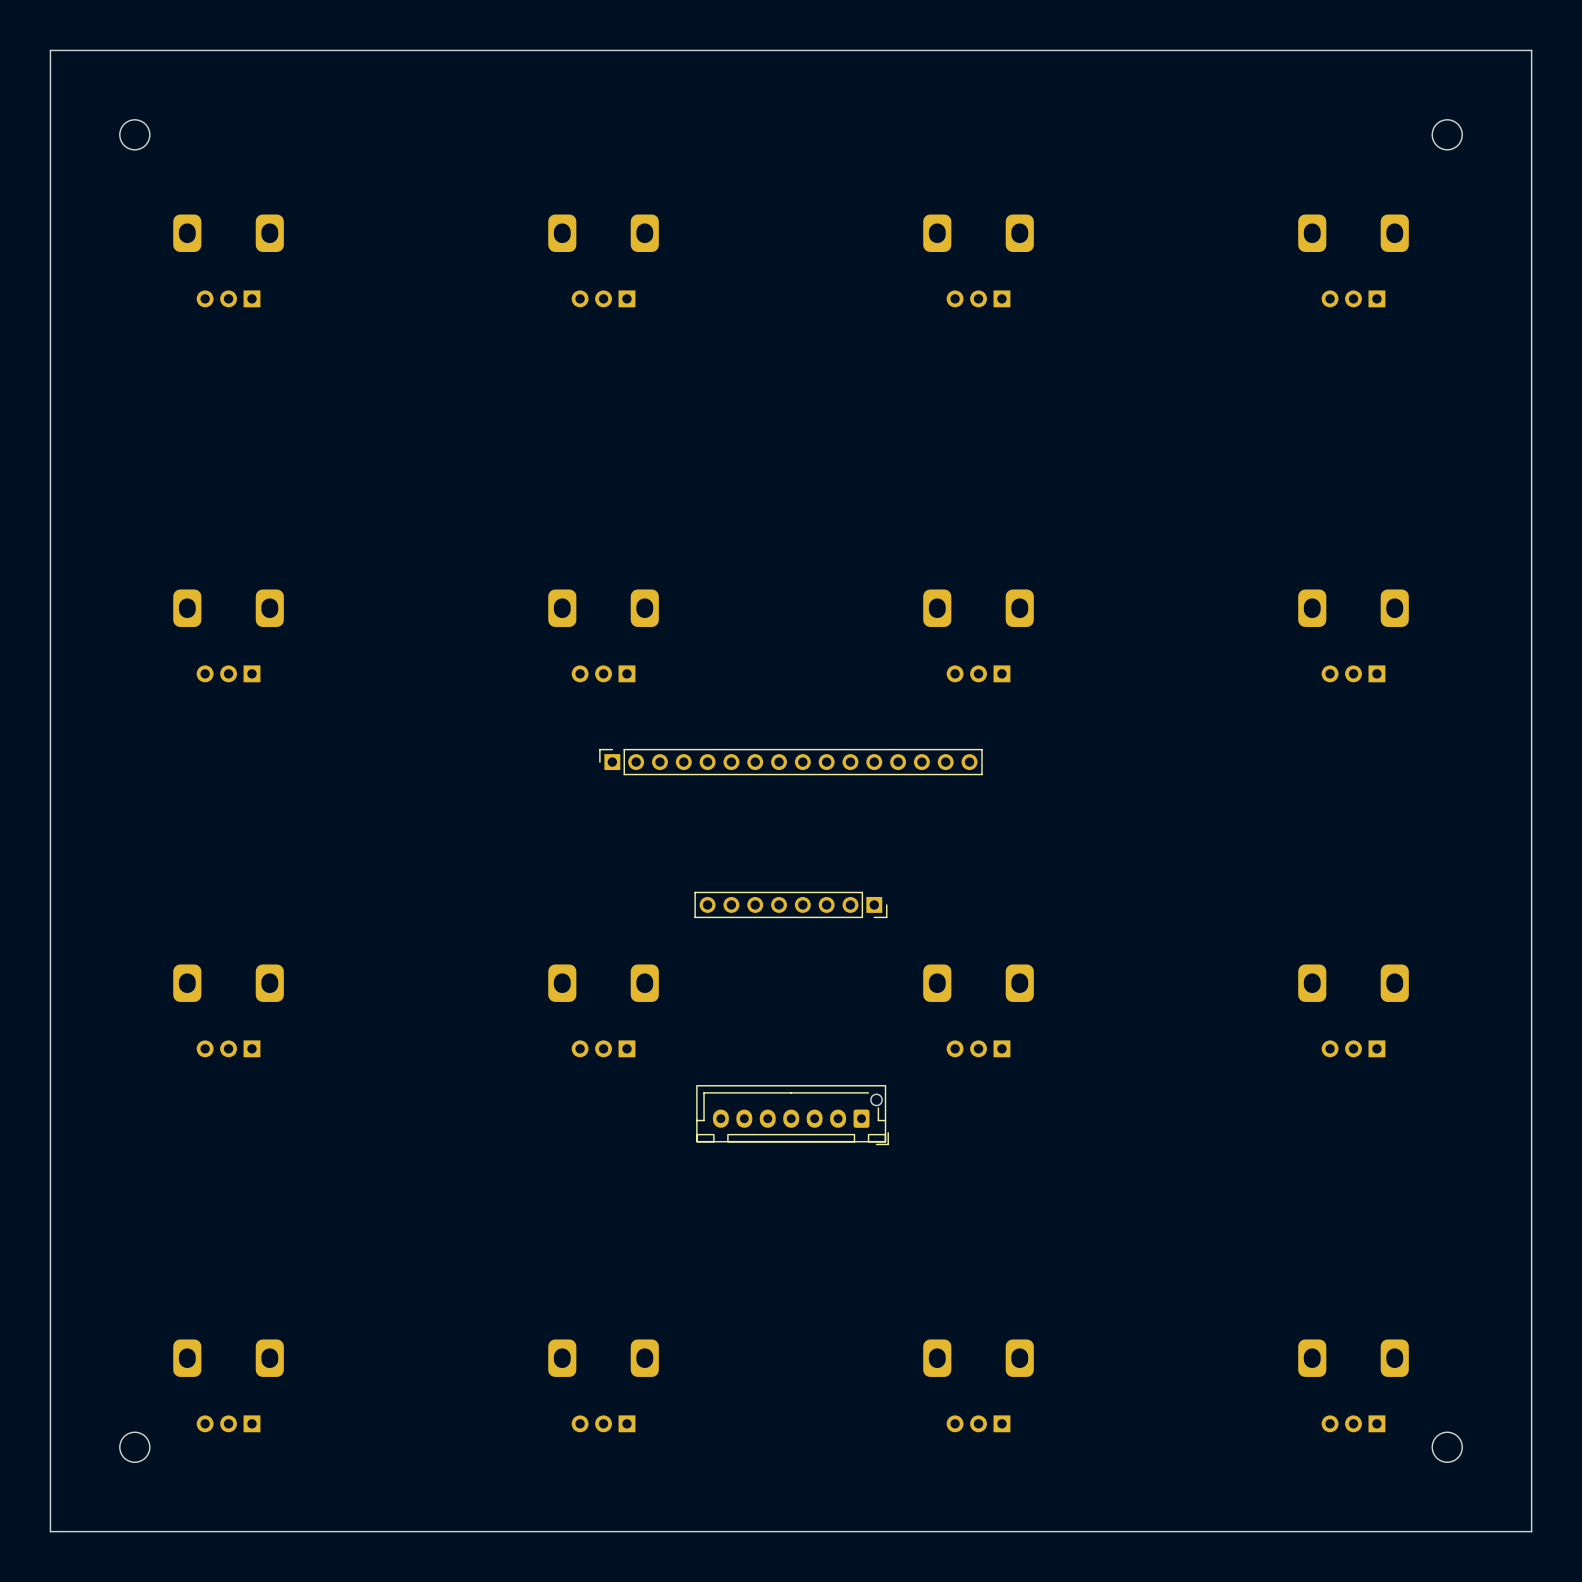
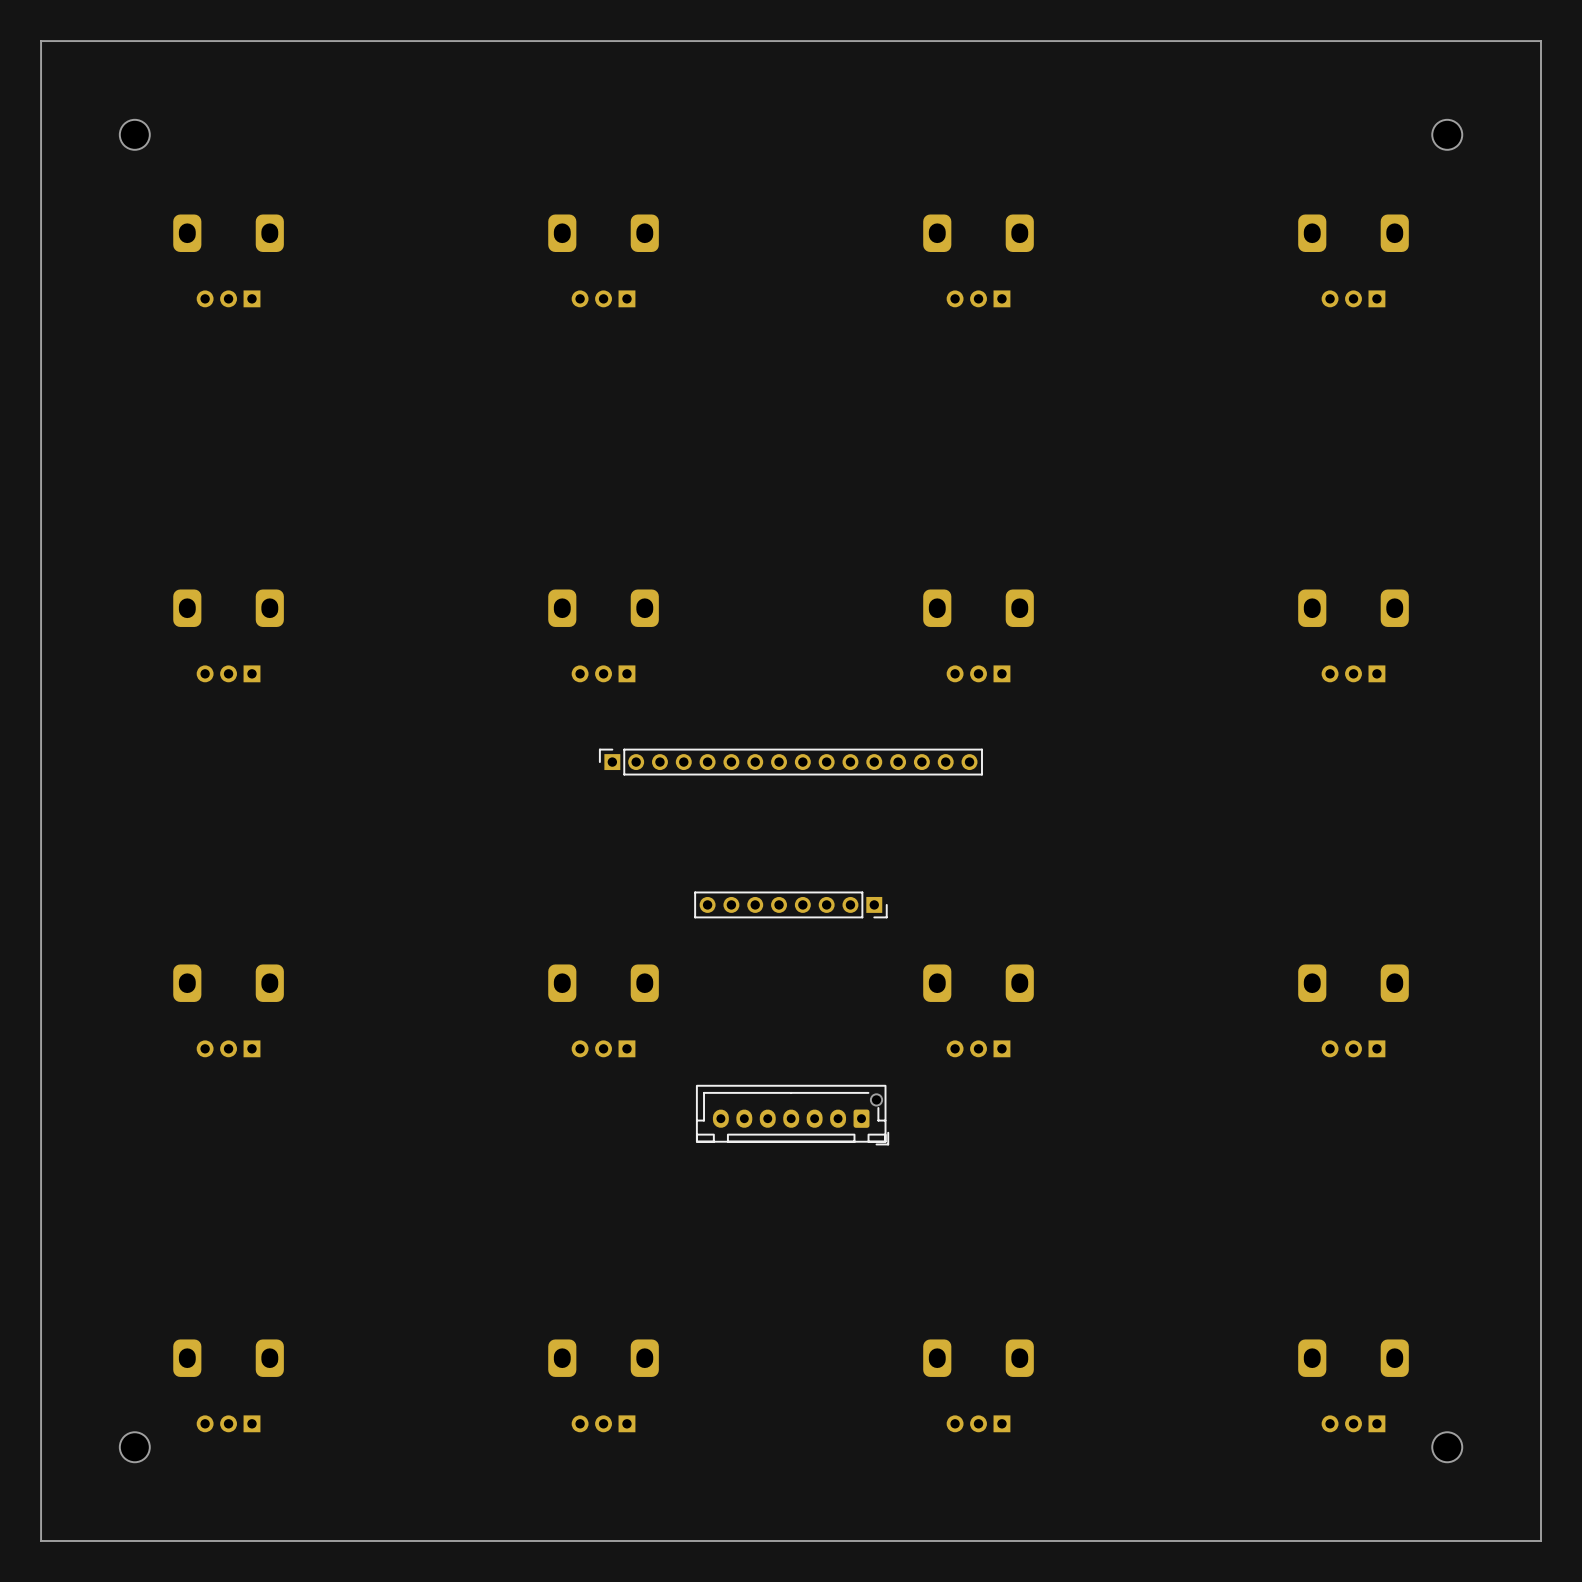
board edge: (1531, 50) (50, 50) (50, 1531) (1531, 1531) (1531, 50) -> (1541, 41) (1541, 1541) (41, 1541) (41, 41) (1541, 41)

